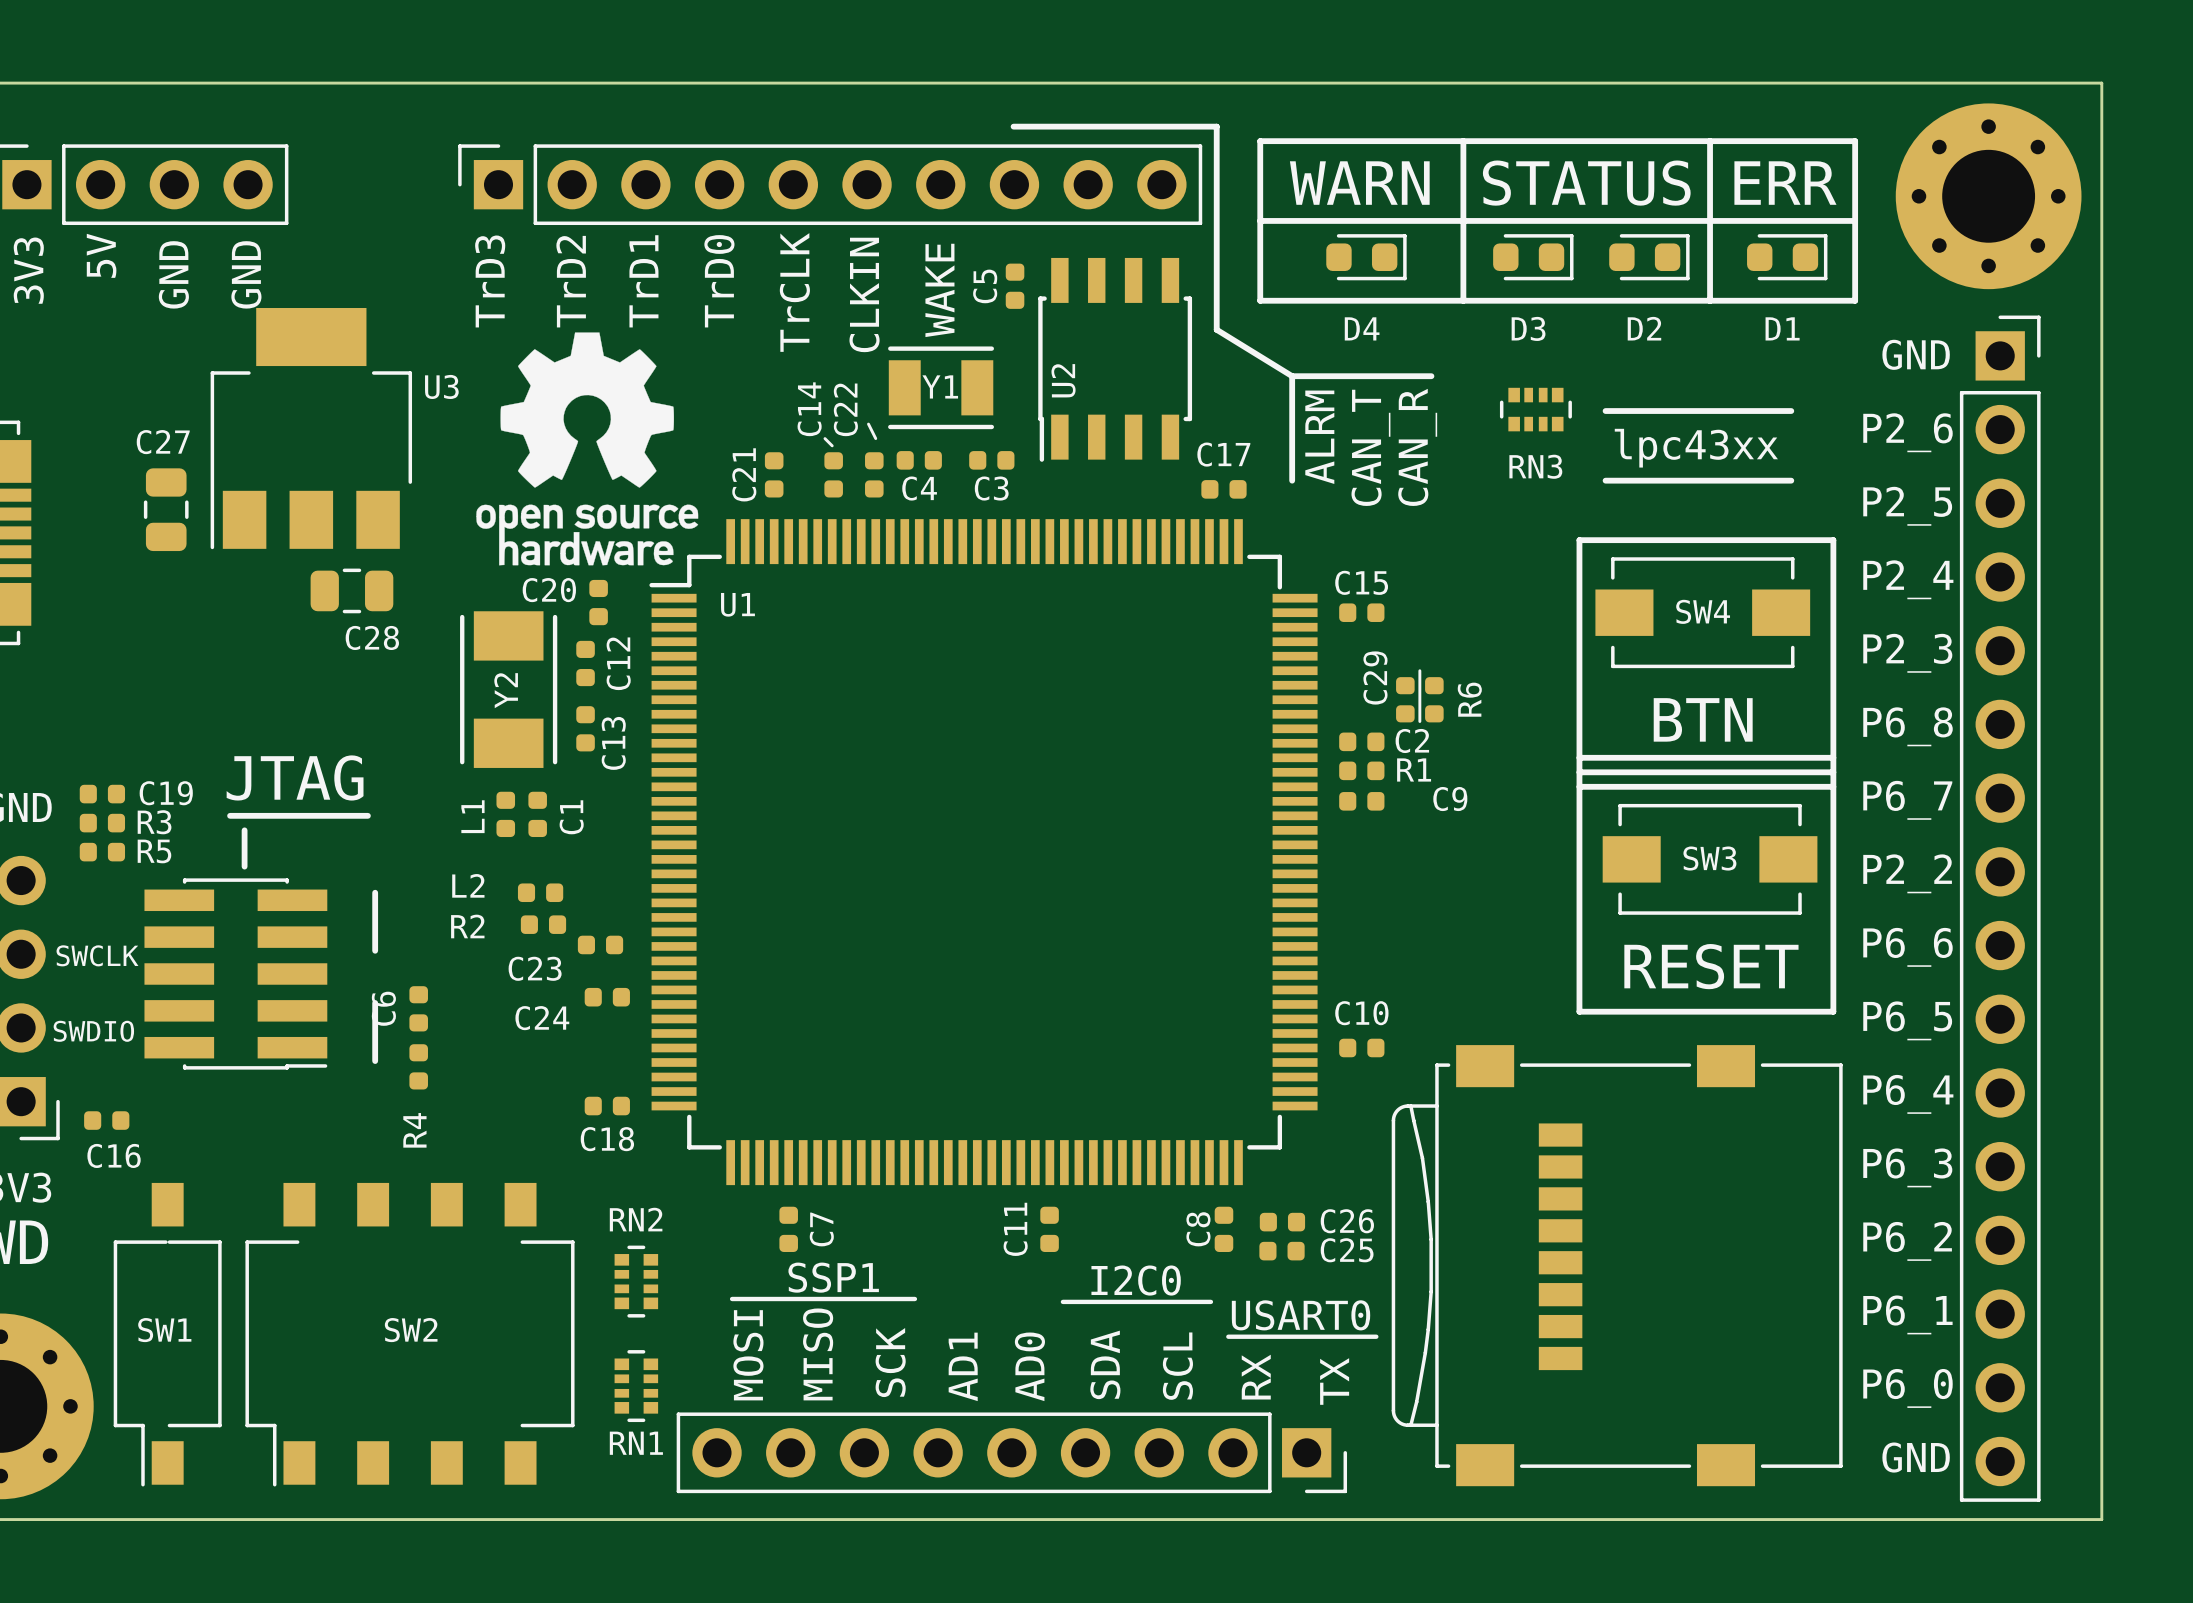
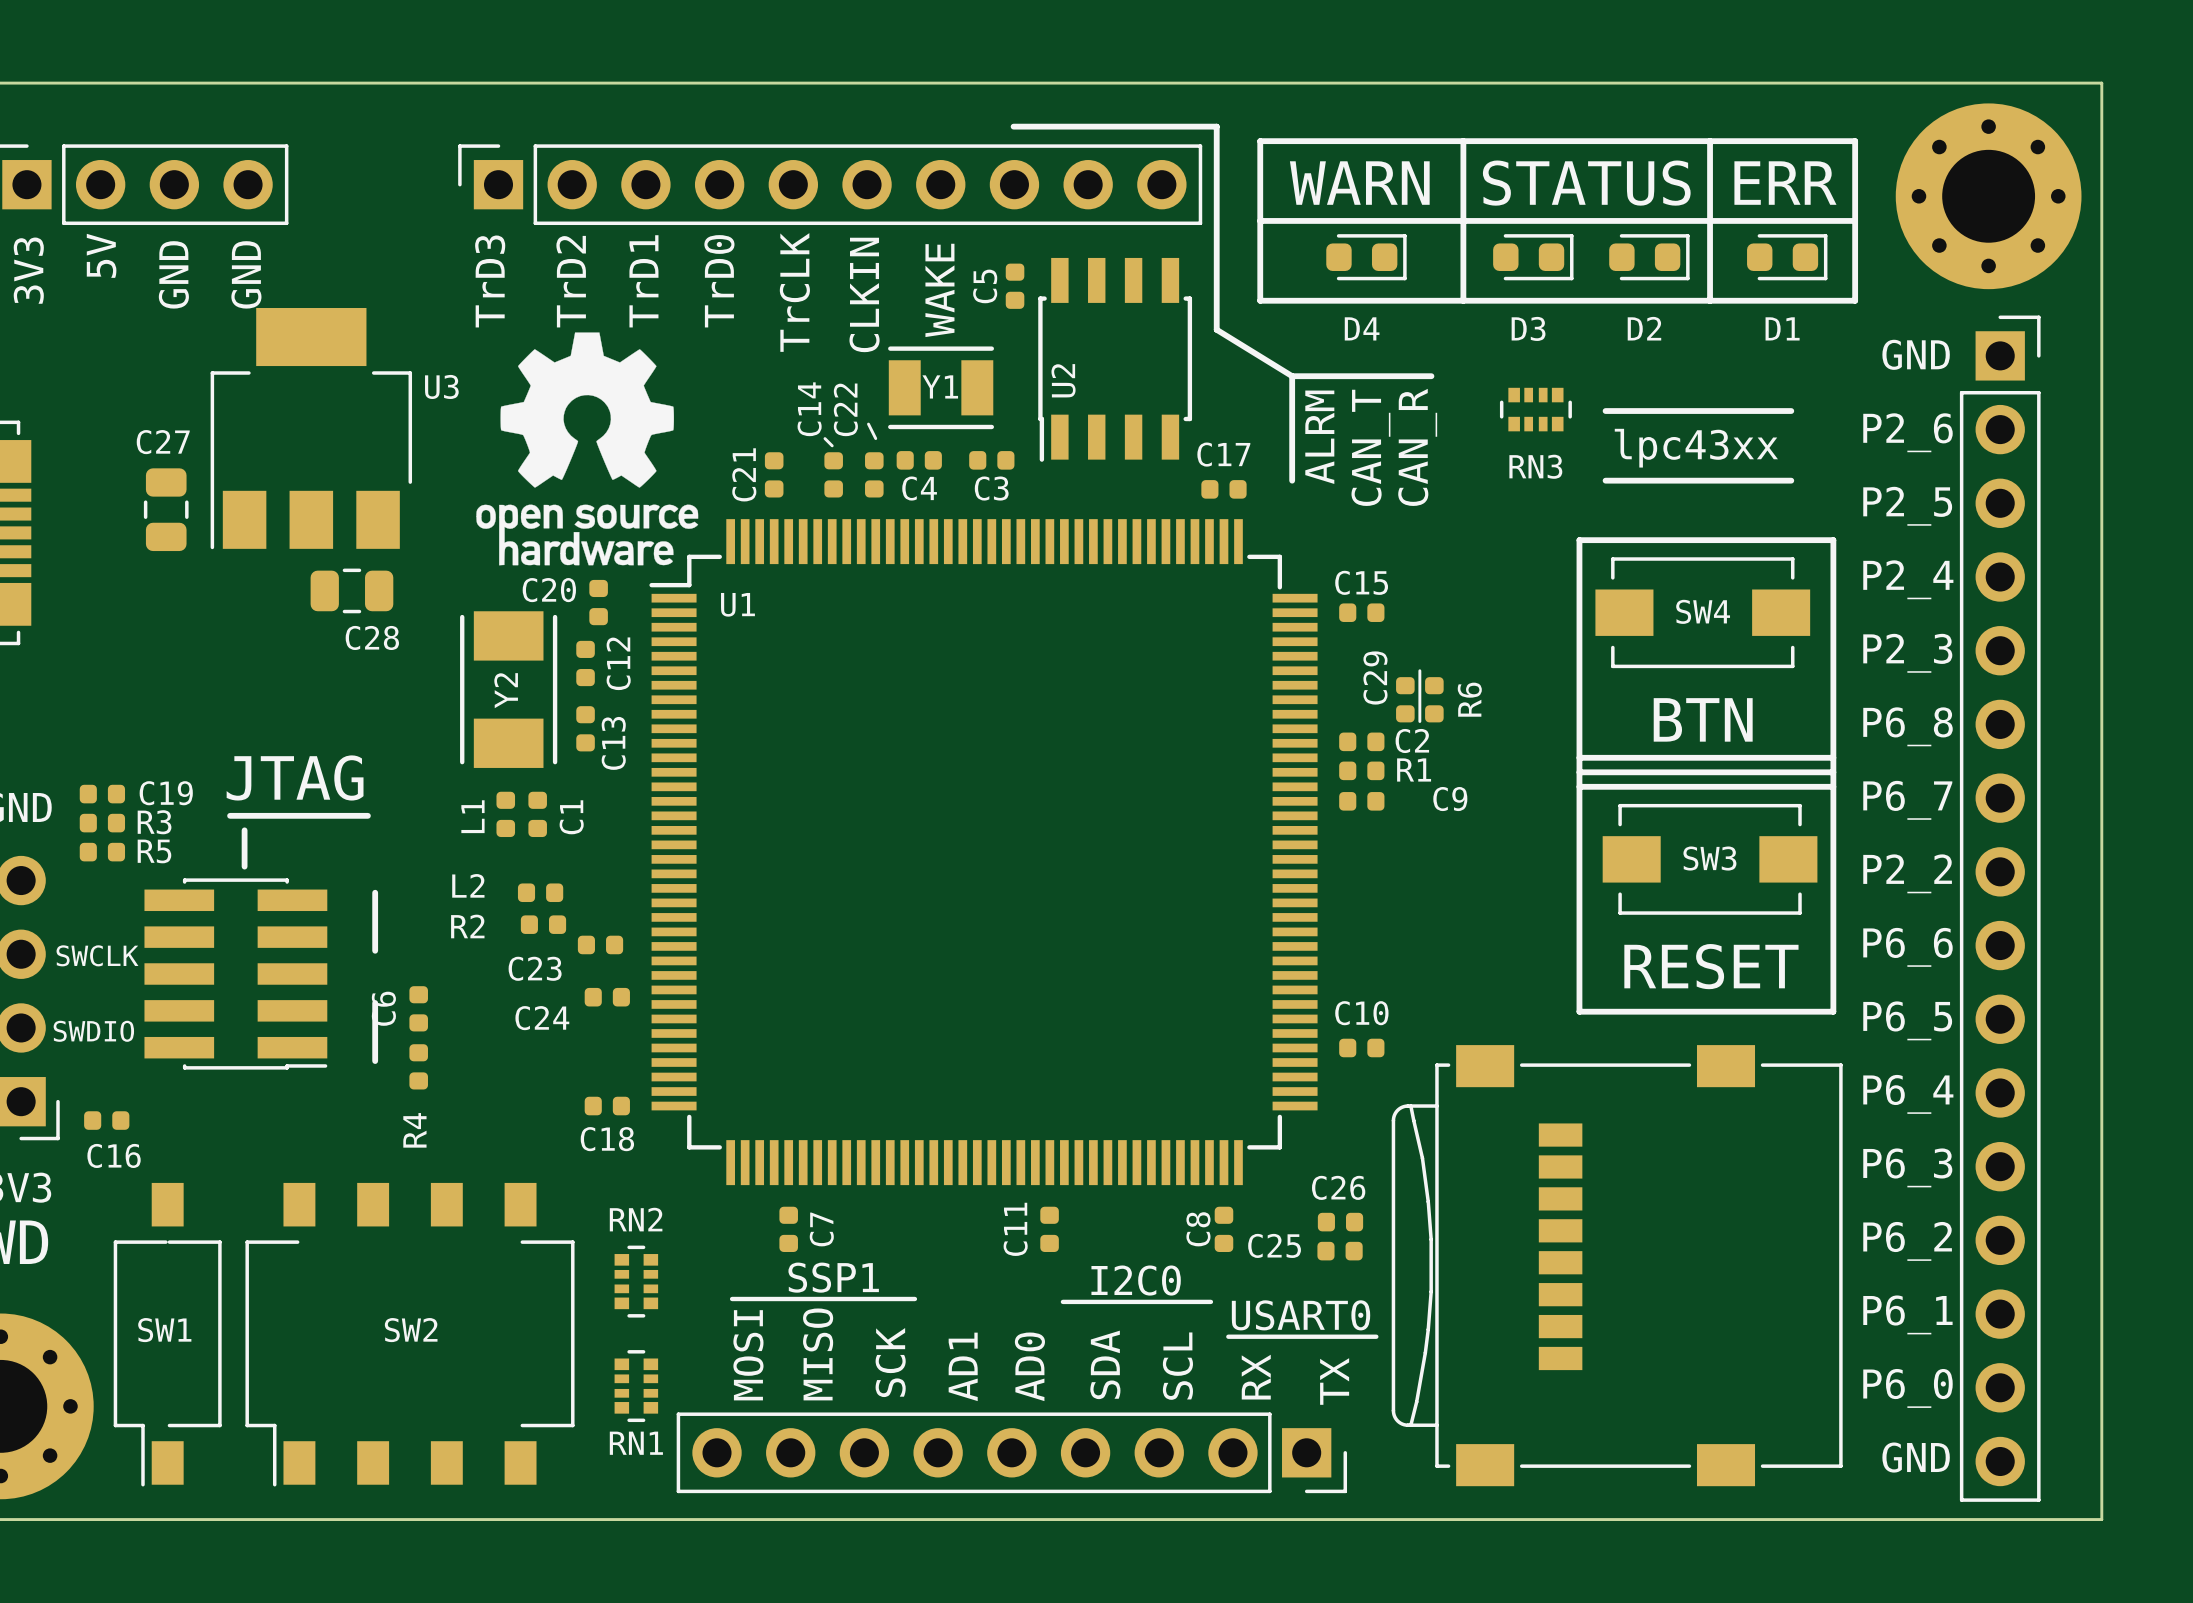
C26 name position: C26 (1347, 1221) -> C26 (1338, 1187)
C26 position: (1282, 1222) -> (1340, 1222)
C25 name position: C25 (1347, 1250) -> C25 (1274, 1245)
C25 position: (1282, 1251) -> (1340, 1251)

